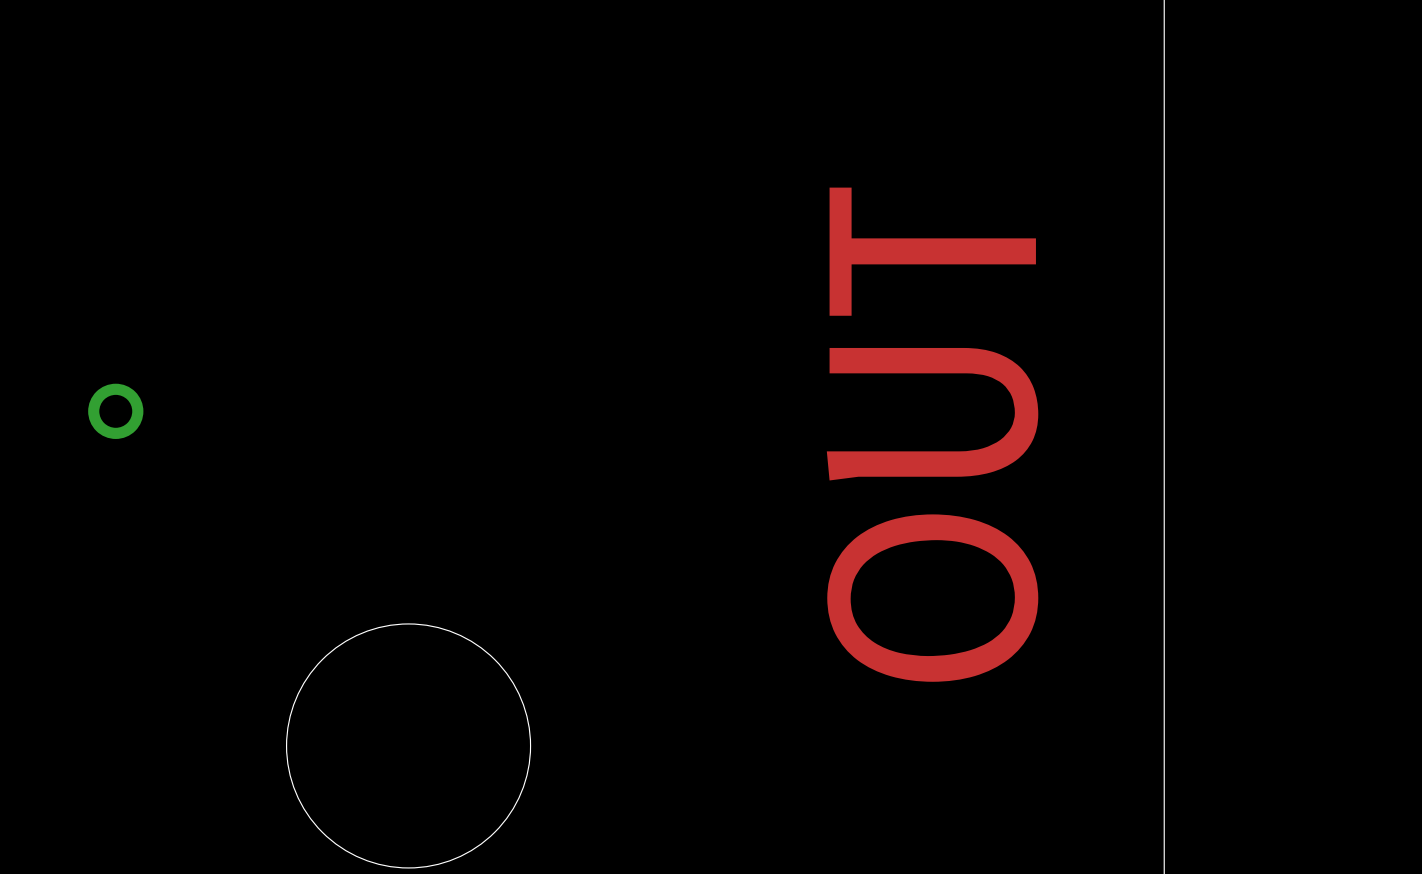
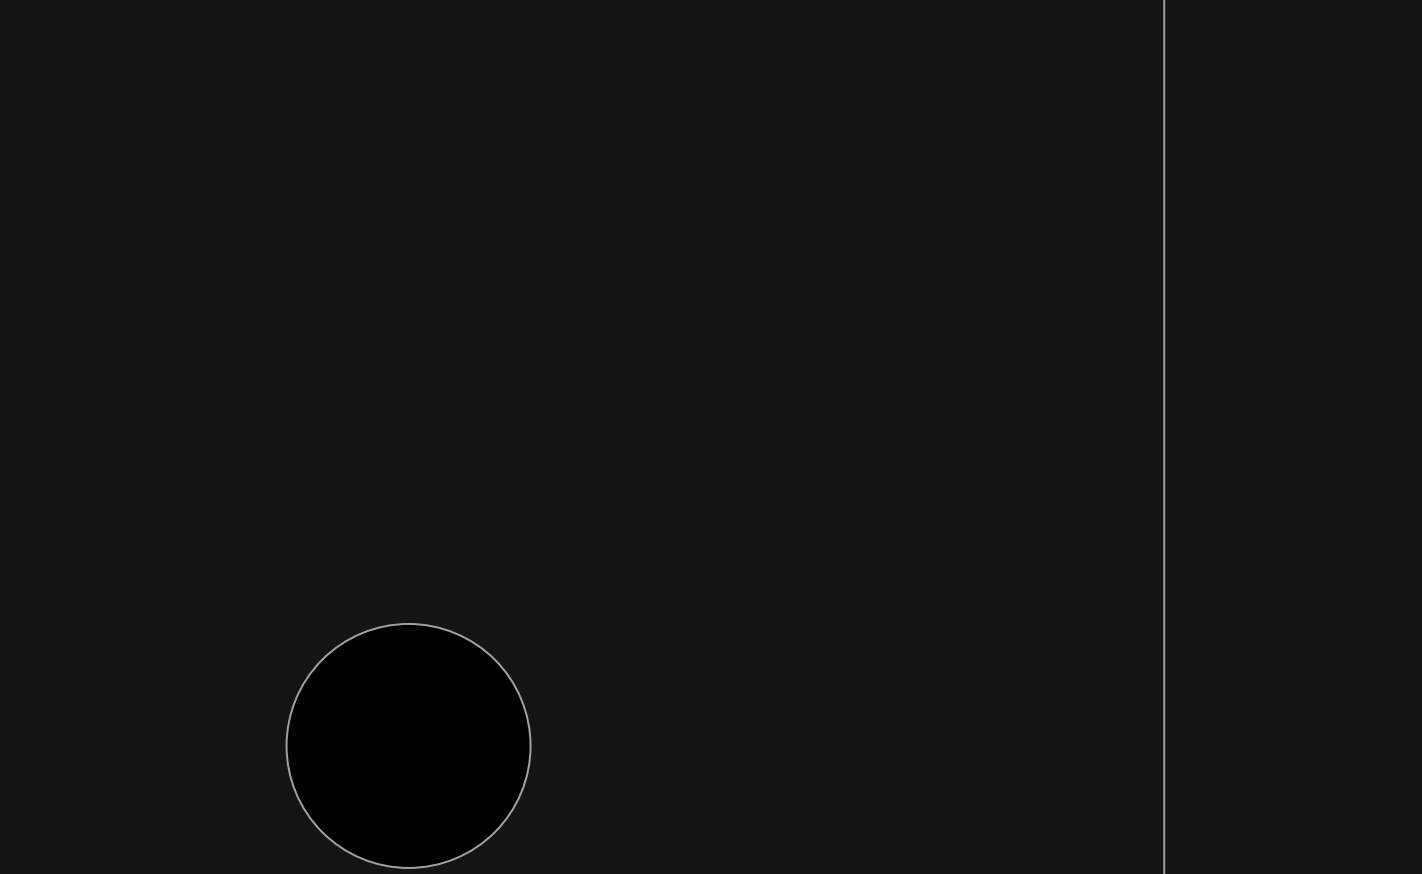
via: (115, 411) -> none
text: OUT (932, 434) -> none

